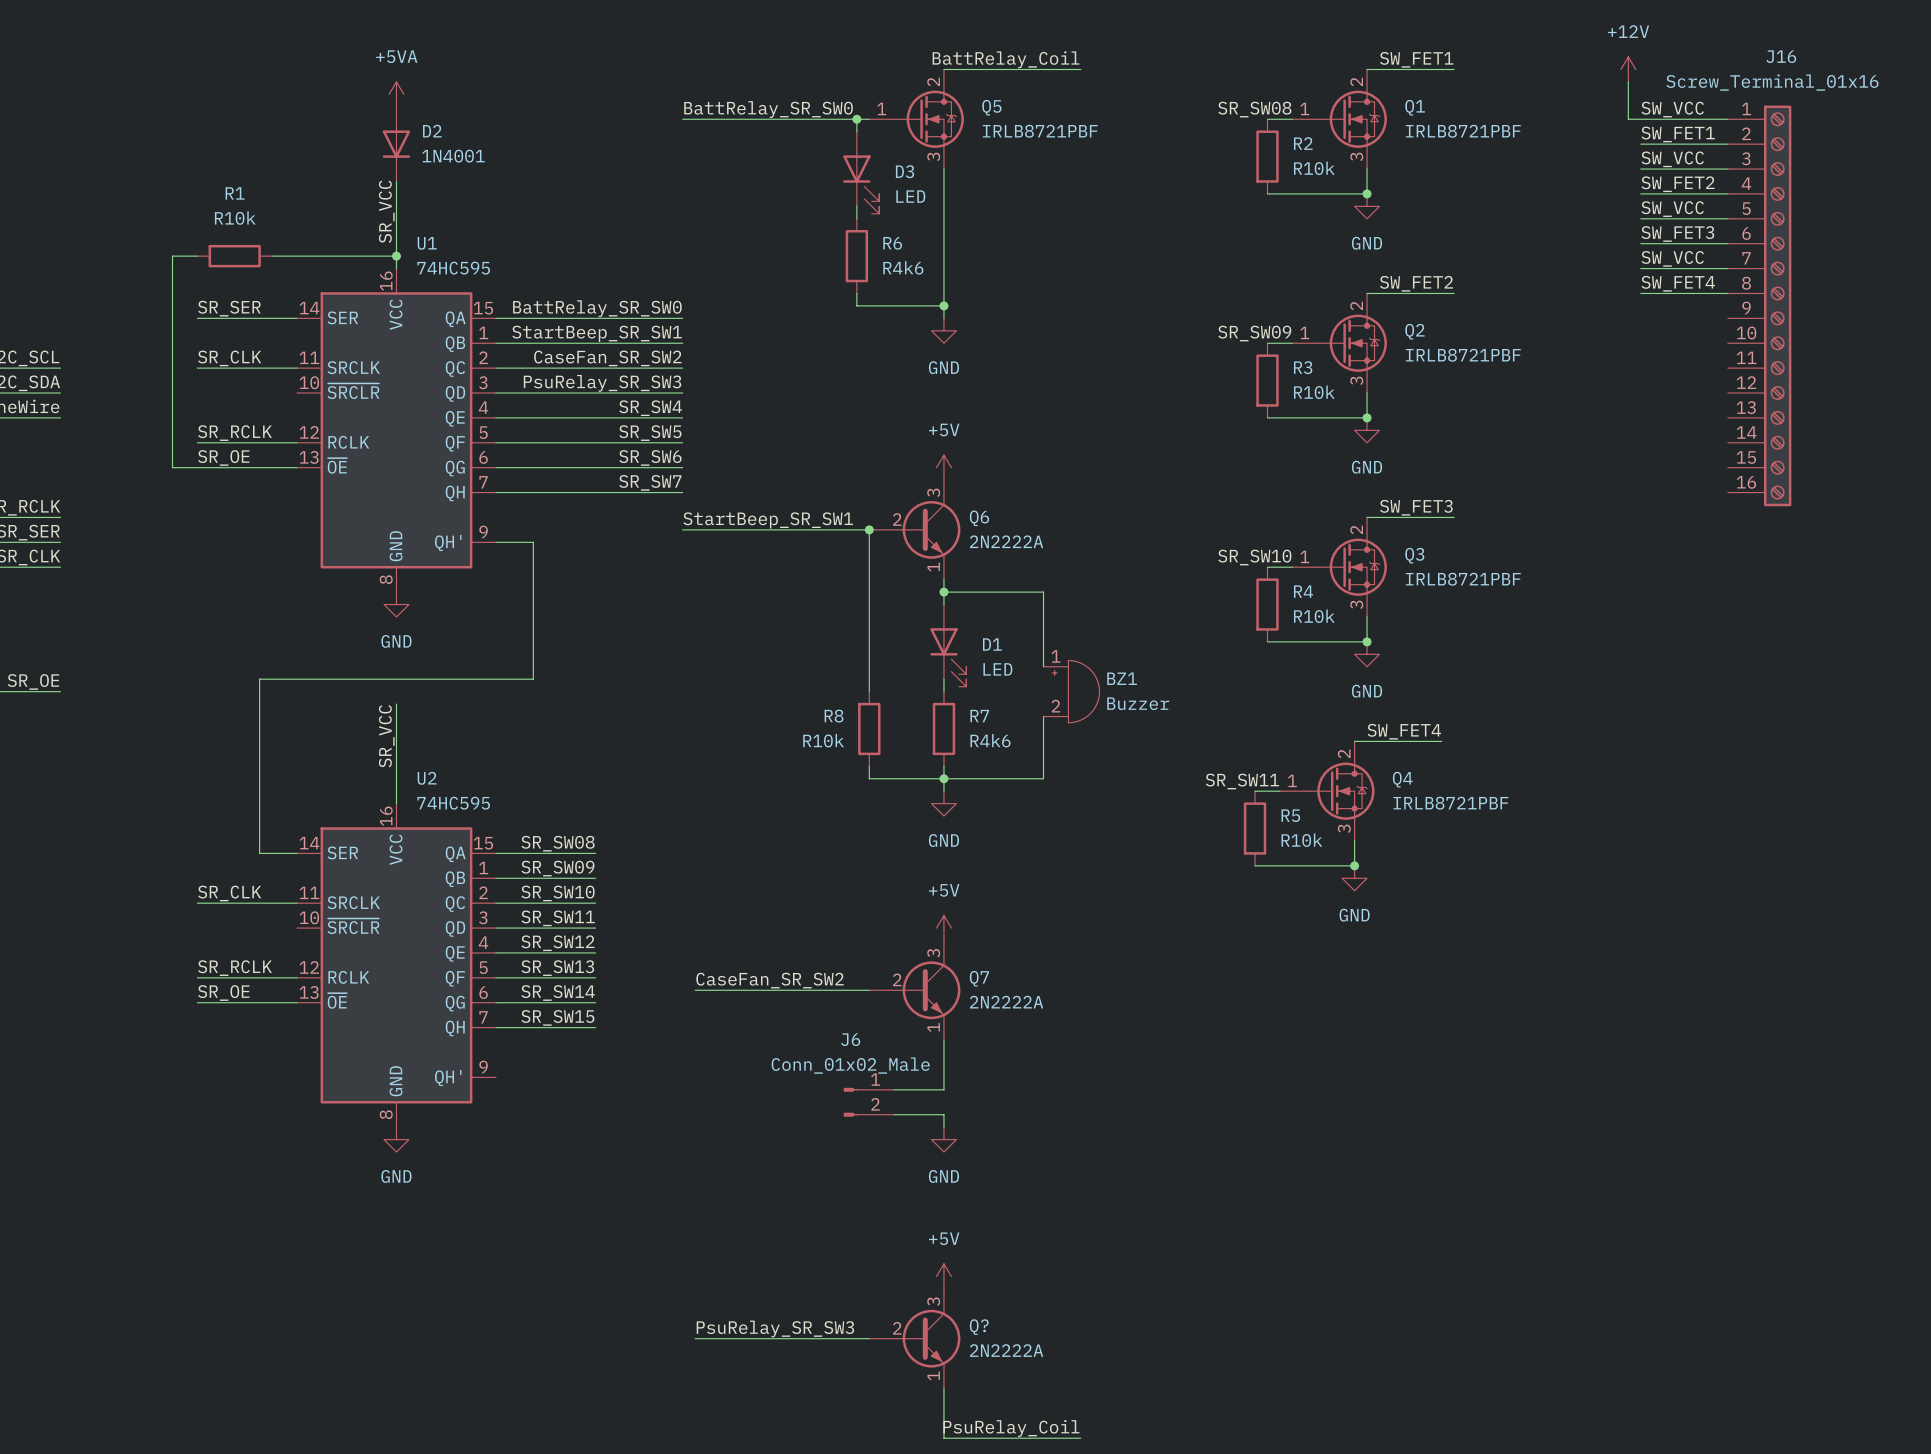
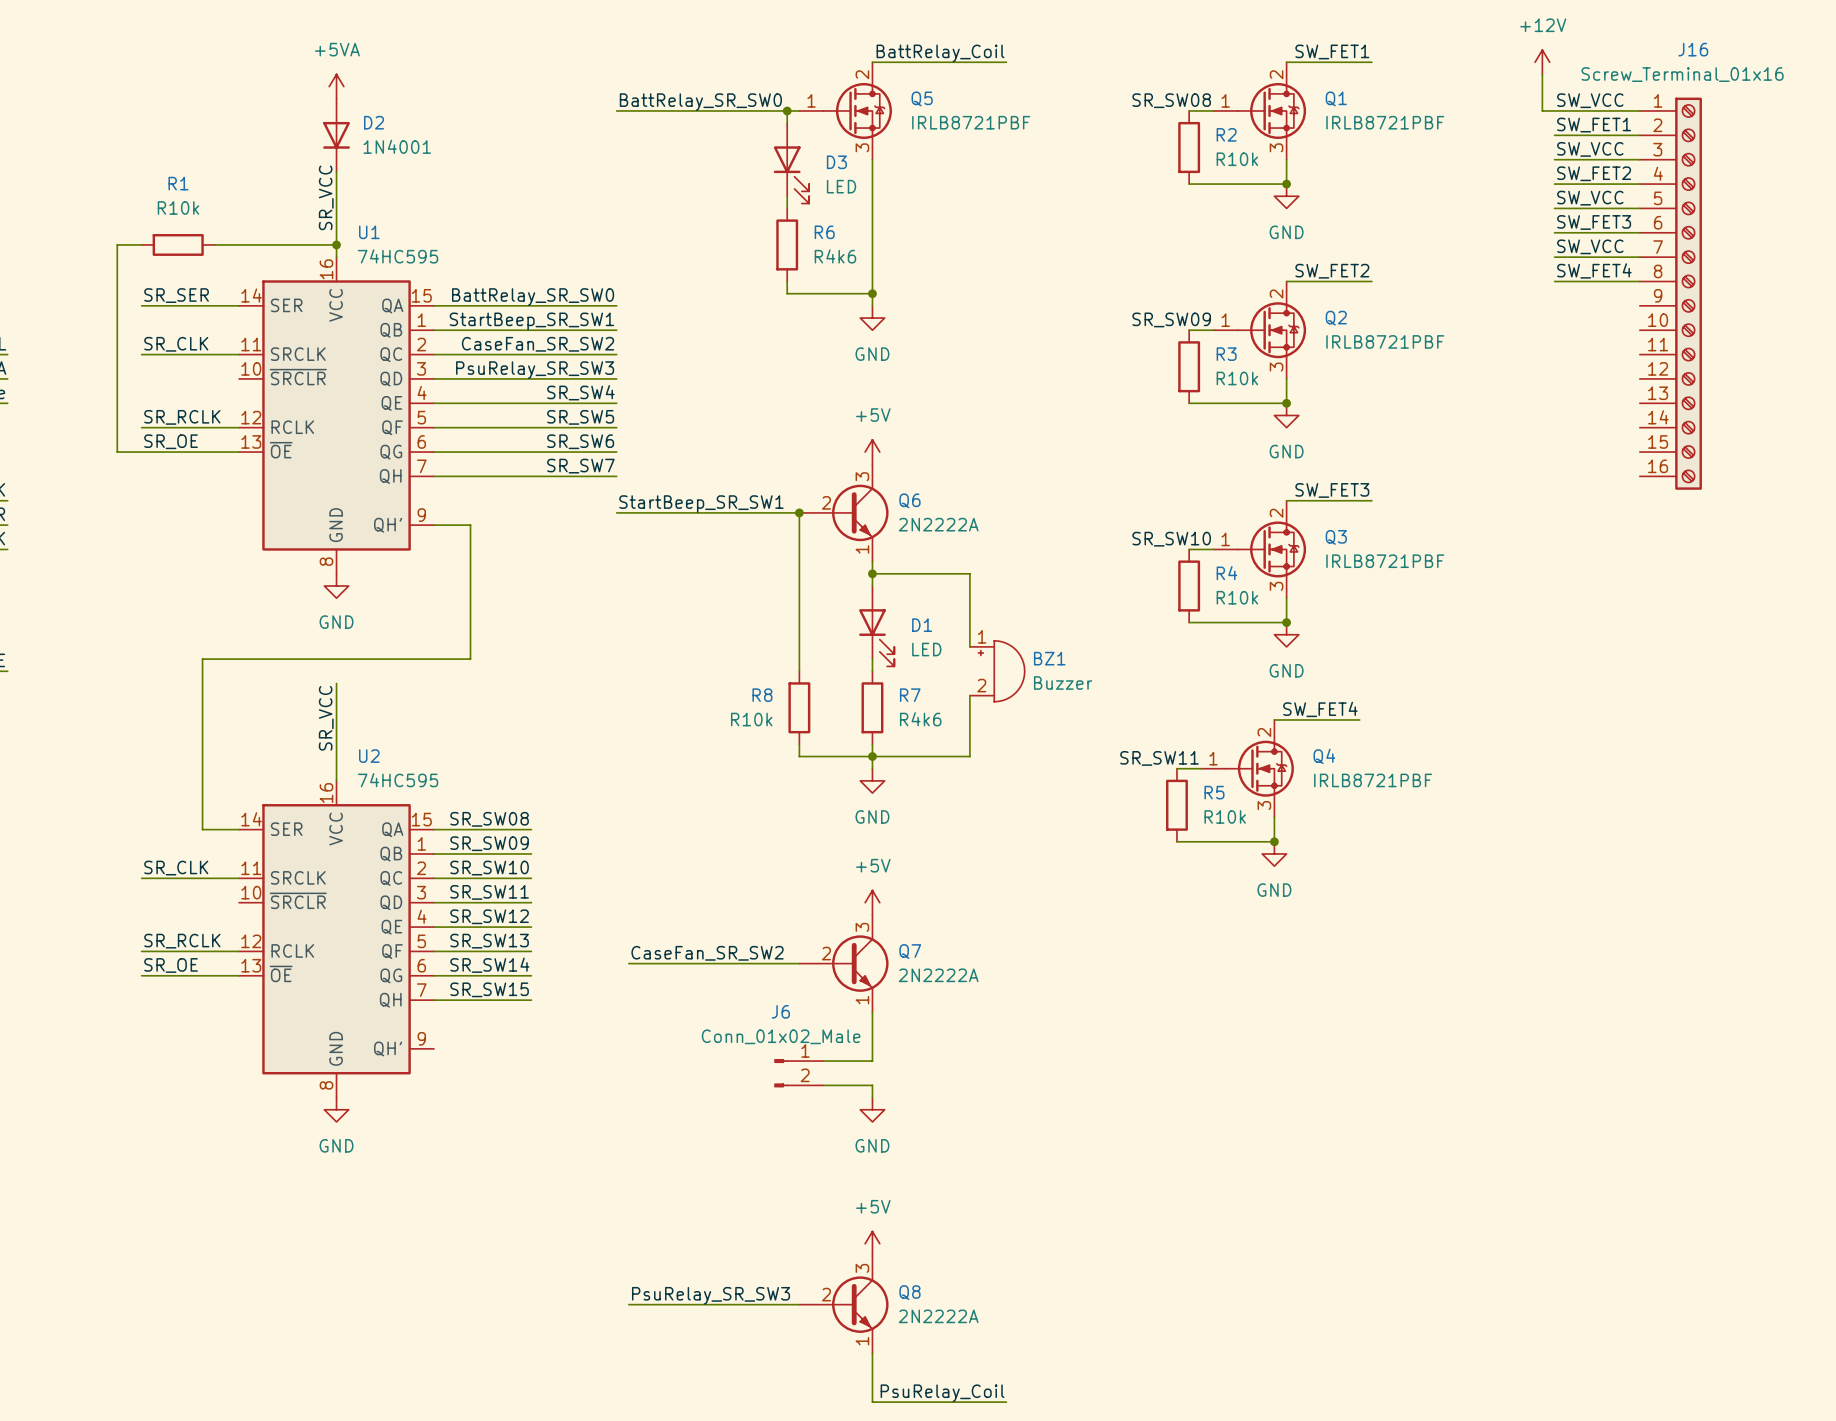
Q? name: Q? (979, 1327) -> Q8 (909, 1292)

